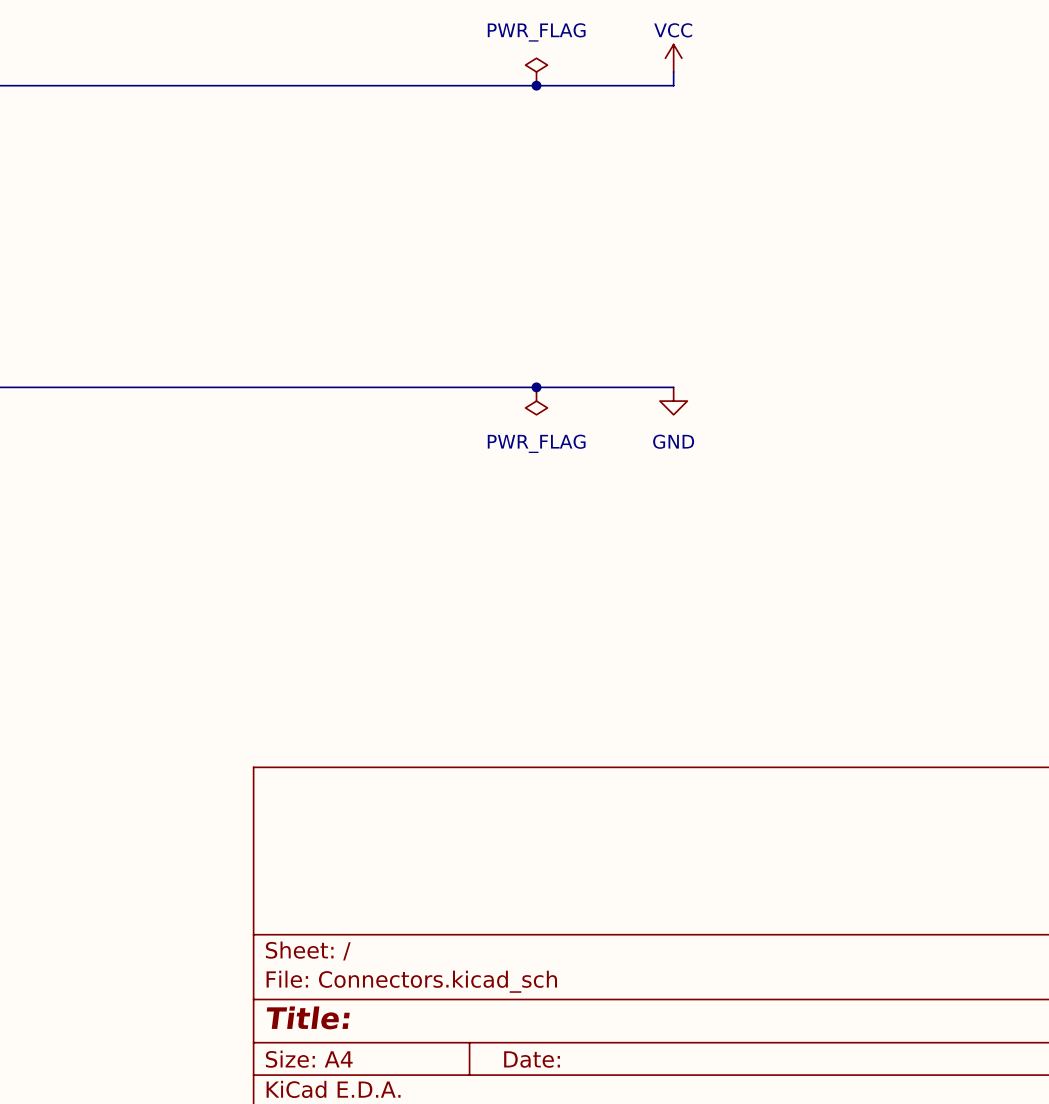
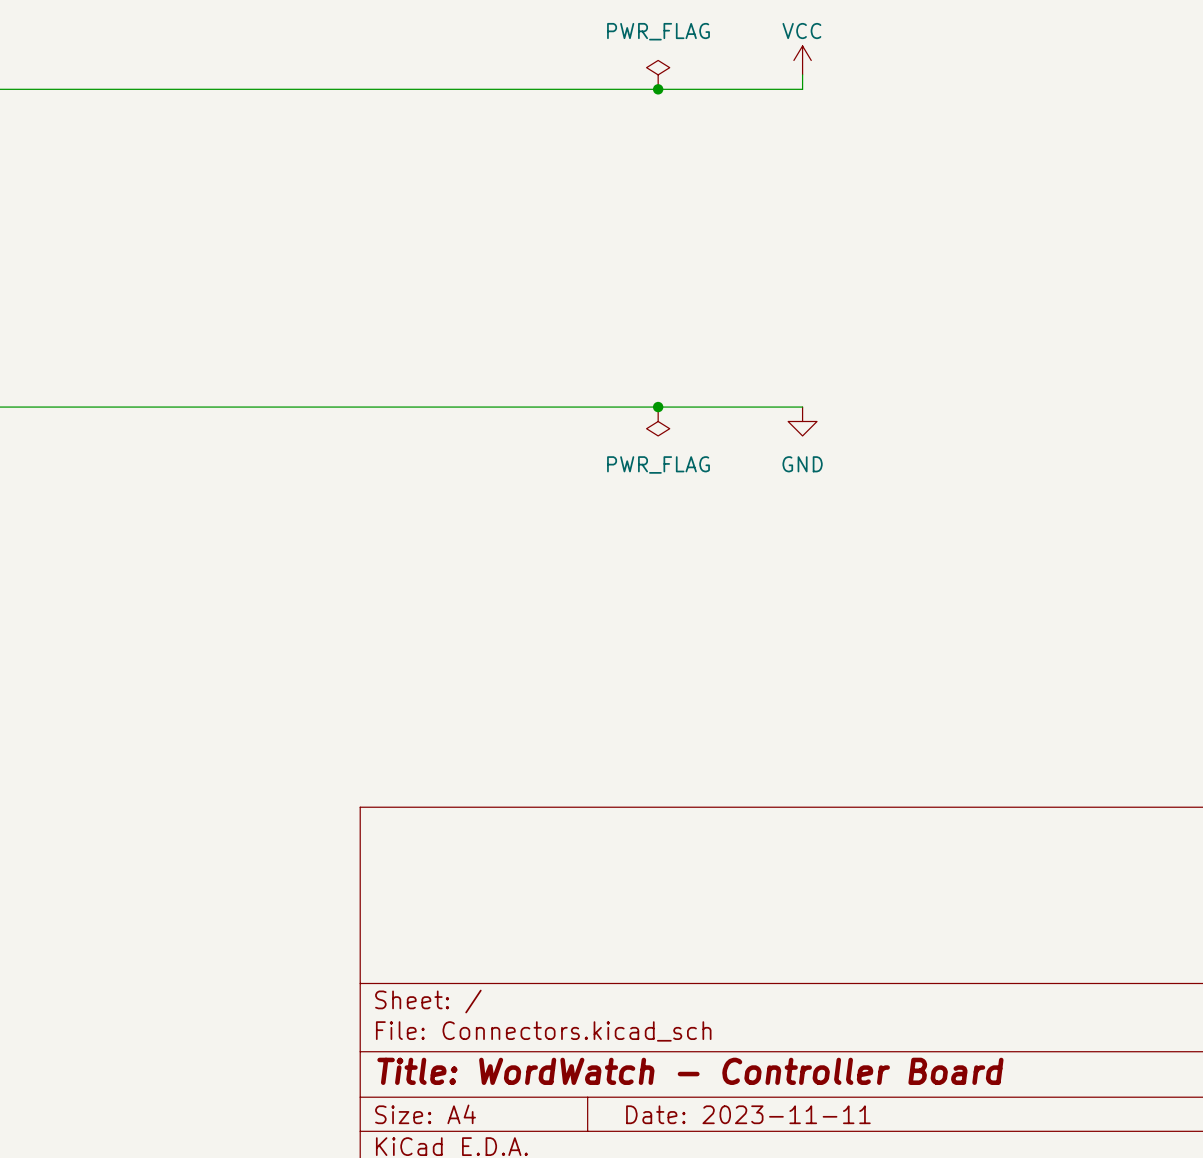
title block: Title: (308, 1017) -> Title: WordWatch - Controller Board (690, 1071)
title block: Date: (532, 1059) -> Date: 2023-11-11 (748, 1114)

